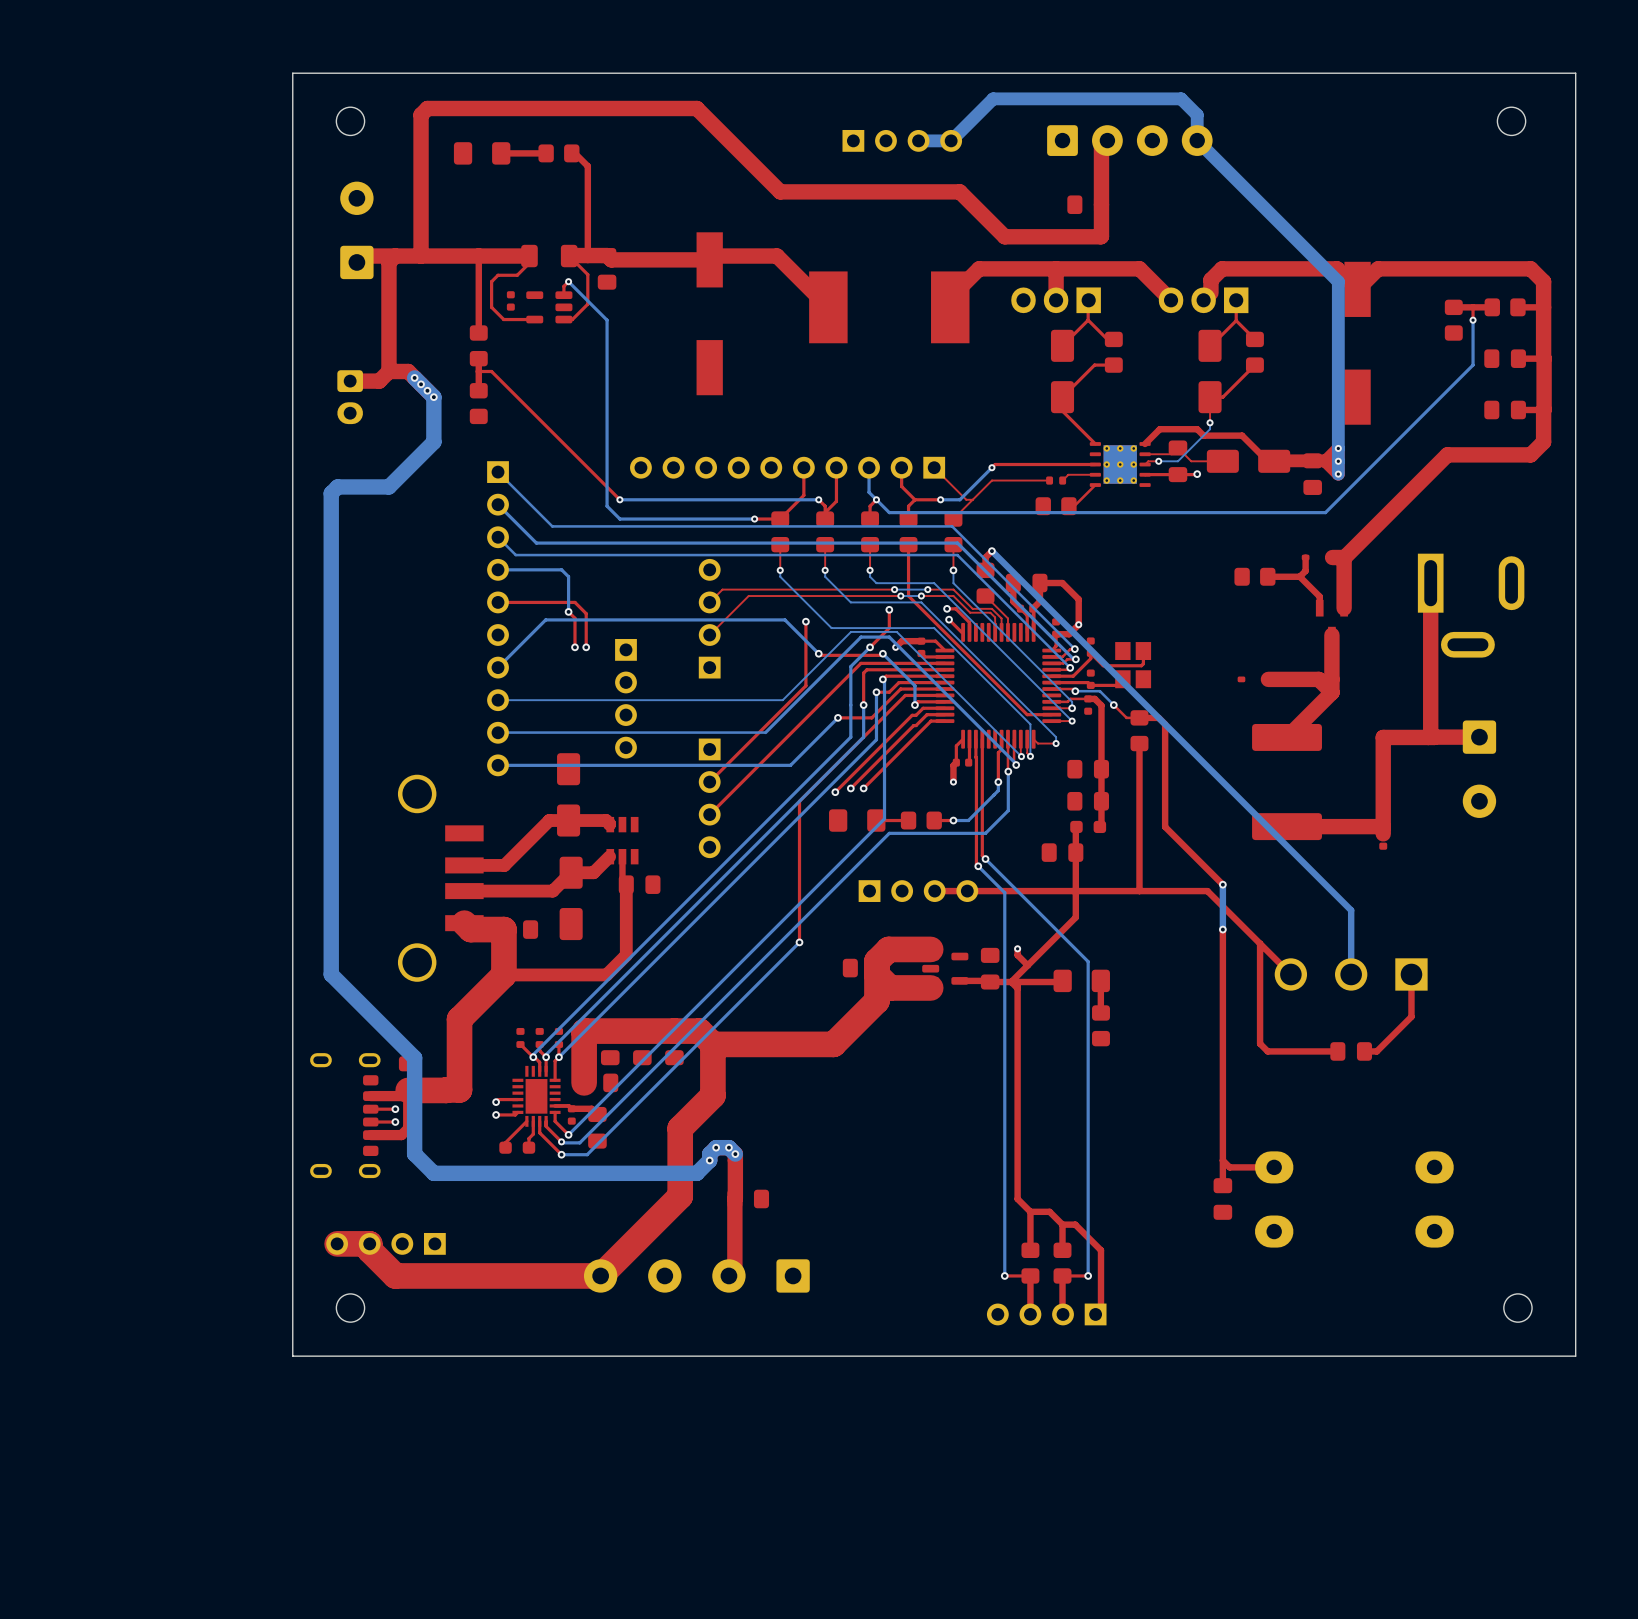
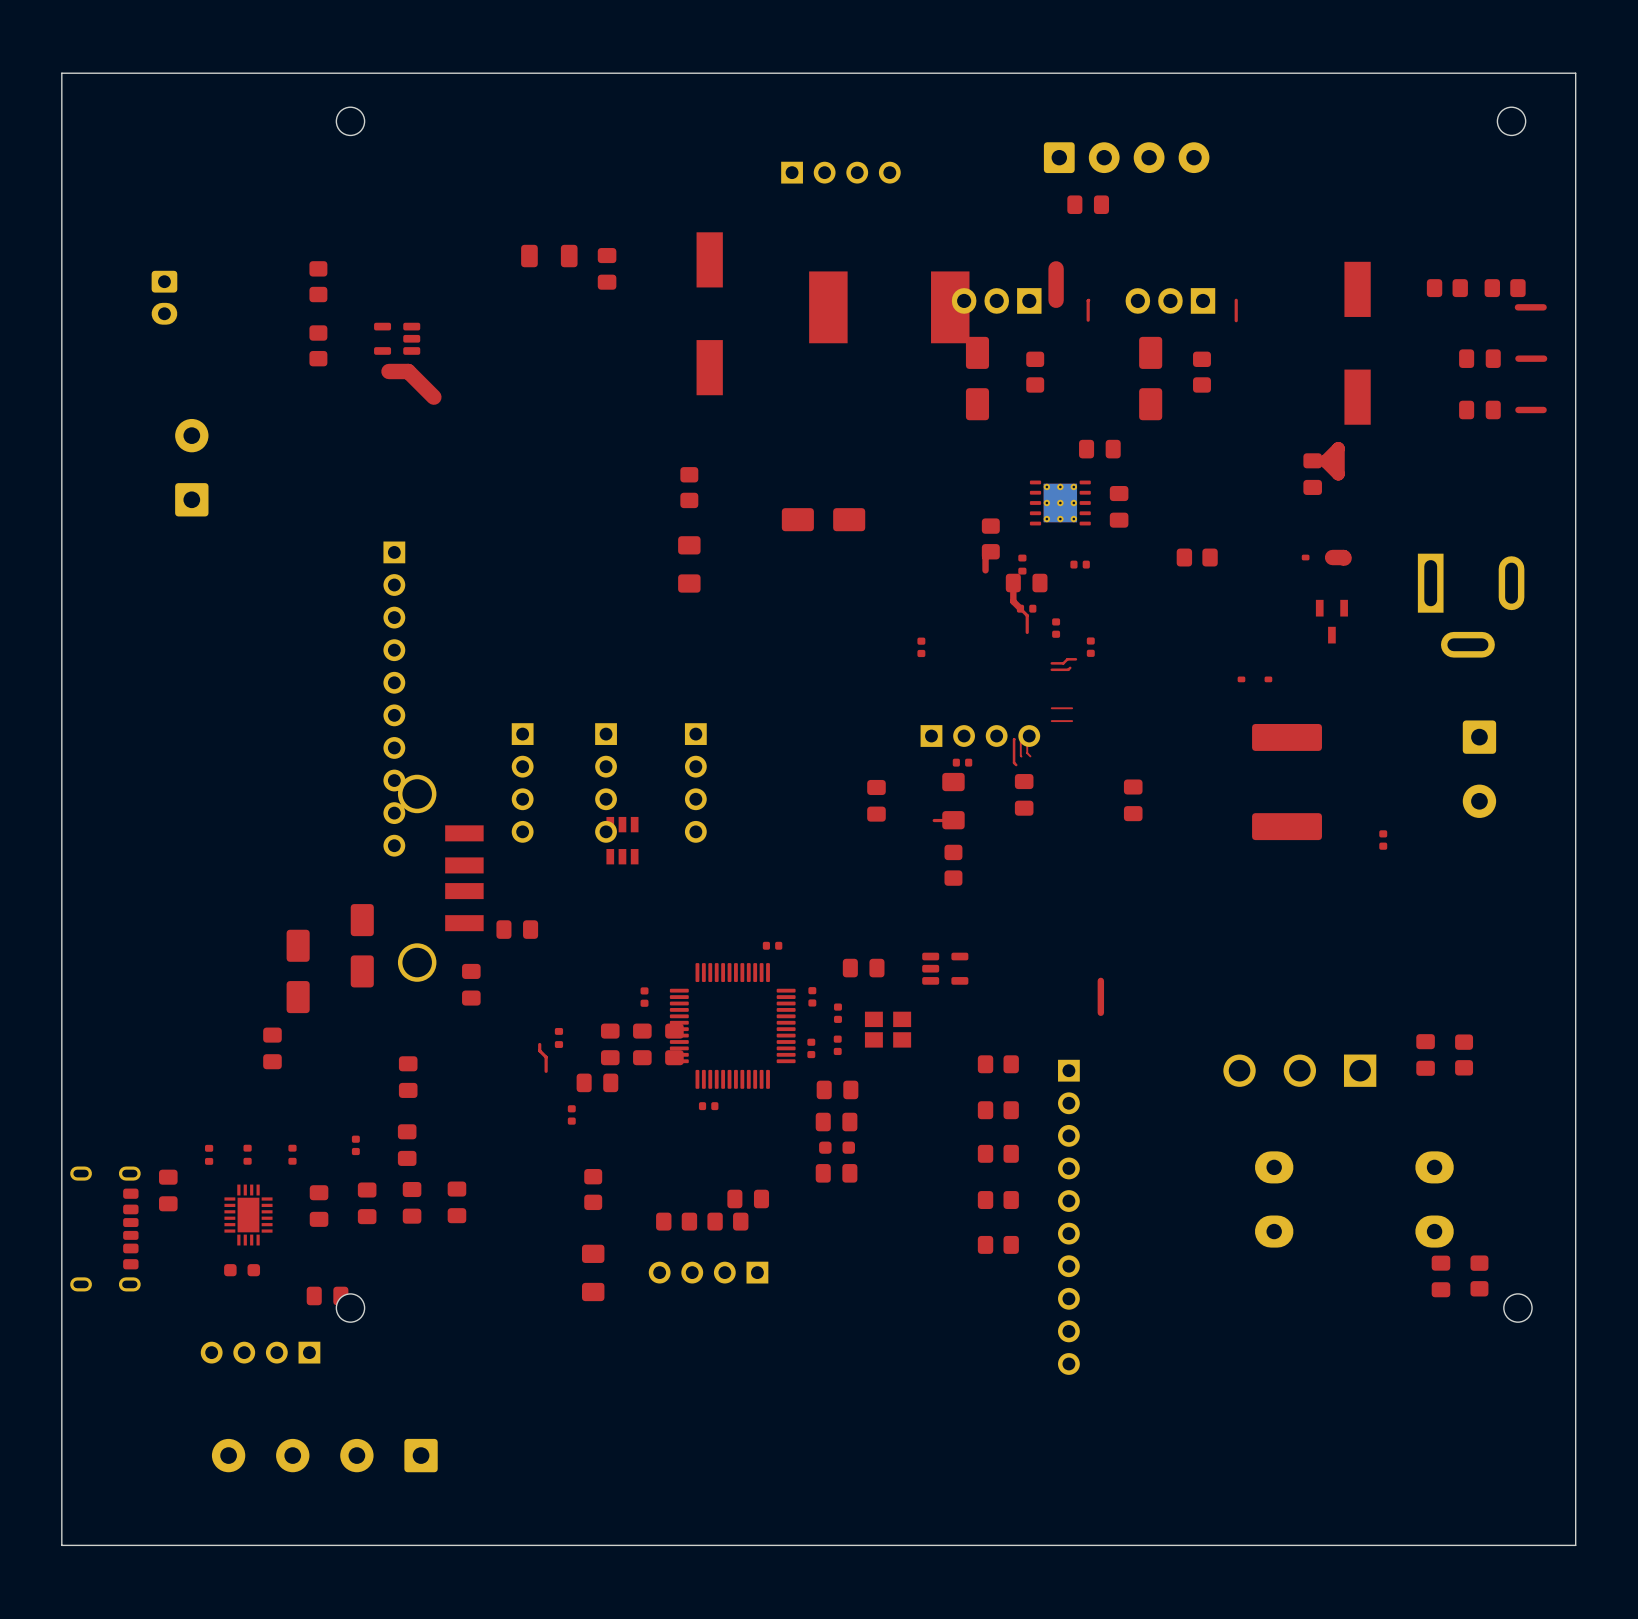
board edge: (292, 73) (292, 1356) (1575, 1356) -> (292, 73) (61, 73) (61, 1545) (1575, 1545) (1575, 1356)
part position: (902, 140) -> (840, 172)
bottom track: (918, 140) (951, 140) (993, 98) (1181, 98) (1197, 114) (1197, 140) (1338, 281) (1338, 474) -> none
top track: (1107, 140) (1101, 146) (1100, 236) (1004, 236) (959, 191) (780, 191) (696, 108) (427, 108) (421, 114) (421, 256) -> none
part position: (1129, 140) -> (1126, 157)
part: (482, 153) -> none
top track: (546, 153) (501, 153) -> none
part: (558, 153) -> none
top track: (571, 153) (574, 153) (587, 166) (587, 255) -> none
part position: (356, 230) -> (191, 467)
top track: (395, 256) (388, 262) (388, 371) (379, 381) (350, 381) -> none
top track: (478, 256) (478, 333) -> none
top track: (356, 262) (363, 256) (529, 256) (529, 263) (517, 275) (498, 275) (491, 281) (491, 307) (503, 319) (534, 319) -> none
part: none -> (318, 281)
top track: (568, 281) (563, 286) (563, 295) -> none
bottom track: (568, 281) (607, 320) (607, 506) (619, 519) (754, 519) -> none
via: (568, 281) -> none
part: none -> (1447, 288)
top track: (1210, 292) (1210, 279) (1222, 268) (1337, 268) (1357, 289) (1378, 268) (1530, 268) (1543, 281) (1543, 442) (1530, 454) (1447, 454) (1344, 558) (1344, 608) -> none
part: (510, 300) -> none
part: none -> (996, 300)
part: (1056, 300) -> none
top track: (1171, 300) (1139, 268) (979, 268) (950, 297) (950, 307) -> none
part position: (1203, 300) -> (1170, 300)
part position: (549, 307) -> (397, 338)
top track: (828, 307) (777, 256) (713, 256) (709, 259) (611, 259) (607, 255) (569, 255) (587, 274) (587, 304) (572, 319) (563, 319) -> none
top track: (1473, 307) (1473, 320) -> none
top track: (1492, 307) (1453, 307) -> none
part position: (1505, 307) -> (1505, 288)
part: (1453, 320) -> none
bottom track: (1473, 320) (1473, 365) (1325, 512) (889, 512) (869, 492) (869, 467) -> none
via: (1473, 320) -> none
part footprint: [1198, 329, 1222, 414] -> [1193, 351, 1211, 393]
top track: (1113, 339) (1107, 339) (1088, 320) (1062, 345) (1068, 345) -> none
top track: (1254, 339) (1236, 320) (1210, 345) -> none
part: none -> (318, 345)
part: (478, 345) -> none
part position: (1113, 352) -> (1035, 372)
part: (1254, 352) -> none
top track: (478, 358) (478, 390) -> none
part position: (1505, 358) -> (1479, 358)
top track: (1113, 365) (1094, 365) (1062, 397) (1062, 411) (1095, 443) -> none
top track: (1254, 365) (1222, 397) (1210, 397) (1210, 422) -> none
top track: (478, 371) (491, 371) (619, 499) -> none
part: (1062, 371) -> none
bottom track: (414, 377) (433, 397) (433, 442) (388, 486) (337, 486) (331, 493) (331, 974) (414, 1057) (414, 1154) (433, 1173) (696, 1173) (709, 1160) (709, 1154) (716, 1147) (728, 1147) (735, 1154) -> none
via: (414, 377) -> none
part: none -> (977, 378)
part: none -> (1150, 378)
via: (421, 384) -> none
via: (427, 390) -> none
part position: (350, 397) -> (164, 297)
via: (433, 397) -> none
part: (478, 403) -> none
part position: (1505, 409) -> (1479, 409)
bottom track: (1210, 422) (1210, 429) (1177, 461) (1158, 461) -> none
via: (1210, 422) -> none
top track: (1145, 443) (1159, 429) (1197, 429) (1203, 435) (1242, 435) (1267, 461) (1338, 461) -> none
via: (1338, 448) -> none
part: none -> (1099, 449)
top track: (1145, 454) (1171, 454) (1177, 447) (1191, 461) (1222, 461) -> none
top track: (1158, 461) (1148, 461) (1145, 464) -> none
via: (1158, 461) -> none
part: (1177, 461) -> none
part: (1248, 461) -> none
via: (1338, 461) -> none
top track: (1095, 464) (995, 464) (991, 467) -> none
part: (1120, 464) -> none
part: (787, 467) -> none
top track: (803, 467) (803, 495) (780, 519) (754, 519) -> none
top track: (836, 467) (836, 501) (825, 512) (825, 519) (825, 506) (818, 499) -> none
top track: (934, 467) (966, 499) (972, 499) -> none
bottom track: (991, 467) (959, 499) (940, 499) -> none
via: (991, 467) -> none
bottom track: (498, 472) (552, 526) (952, 526) (1074, 649) -> none
top track: (908, 474) (901, 467) (901, 486) (914, 499) -> none
top track: (1095, 474) (1068, 474) (1062, 480) -> none
top track: (1197, 474) (1145, 474) -> none
via: (1197, 474) -> none
via: (1338, 474) -> none
top track: (1049, 480) (991, 480) (953, 519) -> none
part rotation: 0° (1056, 480) -> 90° clockwise (1022, 564)
part position: (1056, 480) -> (1022, 564)
top track: (1095, 485) (1074, 506) (1068, 506) -> none
part: none -> (689, 487)
part footprint: [1035, 497, 1077, 516] -> [1029, 480, 1091, 526]
via: (619, 499) -> none
bottom track: (818, 499) (619, 499) -> none
via: (818, 499) -> none
top track: (876, 499) (870, 506) (870, 519) -> none
via: (876, 499) -> none
top track: (914, 499) (908, 506) (908, 519) -> none
top track: (940, 499) (914, 499) -> none
via: (940, 499) -> none
bottom track: (498, 504) (536, 543) (957, 543) (1073, 659) (1075, 659) -> none
part: none -> (1119, 506)
part footprint: [816, 511, 835, 553] -> [781, 508, 866, 532]
via: (754, 519) -> none
part: (780, 531) -> none
part: (870, 531) -> none
part: (908, 531) -> none
part: (953, 531) -> none
bottom track: (498, 537) (515, 555) (957, 555) (1070, 667) -> none
part: none -> (990, 538)
top track: (780, 544) (780, 570) -> none
top track: (825, 544) (825, 570) -> none
top track: (870, 544) (870, 570) -> none
top track: (908, 544) (908, 596) (1027, 714) (1051, 714) -> none
top track: (953, 544) (953, 570) -> none
bottom track: (991, 551) (1351, 910) (1351, 974) -> none
via: (991, 551) -> none
top track: (1305, 557) (1305, 570) (1299, 576) -> none
part: none -> (689, 564)
part: none -> (1080, 564)
bottom track: (498, 569) (561, 569) (568, 576) (568, 611) -> none
bottom track: (780, 570) (780, 576) (831, 628) (934, 628) (1030, 724) (1030, 756) -> none
via: (780, 570) -> none
bottom track: (825, 570) (825, 576) (850, 602) (921, 602) (1056, 737) (1056, 743) -> none
via: (825, 570) -> none
bottom track: (870, 570) (870, 576) (876, 583) (934, 583) (1072, 721) -> none
via: (870, 570) -> none
bottom track: (953, 570) (953, 583) (1072, 701) (1072, 708) -> none
via: (953, 570) -> none
part position: (1254, 576) -> (1197, 557)
top track: (1299, 576) (1267, 576) -> none
top track: (1299, 576) (1319, 596) (1319, 608) -> none
part: (985, 583) -> none
top track: (1430, 583) (1430, 734) (1428, 737) -> none
top track: (894, 589) (722, 589) (709, 602) -> none
via: (894, 589) -> none
top track: (927, 589) (953, 589) (972, 608) (991, 608) (1001, 618) (1001, 632) -> none
bottom track: (927, 589) (894, 589) -> none
via: (927, 589) -> none
top track: (900, 596) (748, 596) (709, 635) -> none
via: (900, 596) -> none
top track: (921, 596) (953, 596) (970, 612) (990, 612) (995, 617) (995, 632) -> none
bottom track: (921, 596) (900, 596) -> none
via: (921, 596) -> none
top track: (985, 596) (1007, 618) (1007, 632) -> none
top track: (498, 602) (574, 602) (586, 613) (586, 647) -> none
top track: (947, 608) (955, 608) (969, 622) (969, 632) -> none
via: (947, 608) -> none
top track: (889, 609) (889, 628) (870, 647) -> none
via: (889, 609) -> none
top track: (568, 611) (574, 618) (574, 647) -> none
via: (568, 611) -> none
part position: (498, 618) -> (394, 699)
part: (709, 618) -> none
top track: (949, 619) (963, 632) -> none
via: (949, 619) -> none
top track: (805, 621) (805, 685) (709, 782) -> none
via: (805, 621) -> none
via: (1078, 624) -> none
top track: (1033, 632) (1032, 608) (1039, 601) (1039, 583) (1062, 583) (1078, 599) (1078, 624) (1069, 634) (1056, 634) (1056, 646) (1051, 650) -> none
top track: (1331, 635) (1331, 692) -> none
via: (574, 647) -> none
via: (586, 647) -> none
bottom track: (870, 647) (850, 666) (850, 737) (533, 1054) (533, 1057) -> none
via: (870, 647) -> none
top track: (895, 647) (901, 641) (935, 641) (944, 650) -> none
via: (895, 647) -> none
top track: (1074, 649) (1070, 649) (1062, 656) (1051, 656) -> none
via: (1074, 649) -> none
top track: (1143, 651) (1143, 663) (1141, 665) (1103, 665) (1090, 653) (1090, 658) (1073, 676) (1051, 676) -> none
bottom track: (818, 653) (784, 619) (545, 619) (498, 667) -> none
via: (818, 653) -> none
top track: (882, 653) (881, 655) (820, 655) (818, 653) -> none
bottom track: (882, 653) (914, 685) (914, 705) -> none
via: (882, 653) -> none
top track: (921, 653) (924, 656) (944, 656) -> none
via: (1075, 659) -> none
top track: (944, 663) (860, 663) (709, 814) -> none
part: (1133, 665) -> none
via: (1070, 667) -> none
top track: (944, 669) (866, 669) (863, 672) (863, 705) -> none
top track: (944, 676) (886, 676) (882, 679) -> none
bottom track: (882, 679) (884, 681) (884, 818) (568, 1134) -> none
via: (882, 679) -> none
part: (1090, 679) -> none
top track: (1122, 679) (1116, 685) (1090, 685) (1088, 682) (1051, 682) -> none
top track: (1268, 679) (1318, 679) (1331, 692) -> none
top track: (944, 682) (898, 682) (889, 692) (876, 692) -> none
part: (998, 685) -> none
top track: (944, 689) (900, 689) (871, 717) (837, 717) -> none
top track: (1051, 689) (1073, 689) (1075, 691) -> none
bottom track: (1075, 691) (1099, 691) (1113, 705) -> none
via: (1075, 691) -> none
bottom track: (876, 692) (876, 739) (558, 1057) -> none
via: (876, 692) -> none
top track: (1331, 692) (1287, 737) -> none
top track: (944, 695) (905, 695) (799, 801) (799, 942) -> none
part: (625, 698) -> none
top track: (1088, 698) (1094, 698) (1101, 705) (1101, 825) (1099, 826) -> none
top track: (1088, 698) (1051, 701) -> none
bottom track: (498, 700) (782, 700) (851, 631) (896, 631) (1021, 756) -> none
top track: (944, 701) (918, 701) (914, 705) -> none
bottom track: (863, 705) (863, 737) (546, 1054) (546, 1057) -> none
via: (863, 705) -> none
via: (914, 705) -> none
part: (1088, 705) -> none
top track: (1113, 705) (1126, 717) (1158, 717) (1165, 724) (1165, 826) (1222, 884) -> none
via: (1113, 705) -> none
top track: (944, 708) (923, 708) (916, 715) (912, 715) (835, 792) -> none
via: (1072, 708) -> none
top track: (944, 714) (926, 714) (850, 788) -> none
bottom track: (837, 717) (790, 765) (498, 765) -> none
via: (837, 717) -> none
top track: (944, 721) (931, 721) (863, 788) -> none
via: (1072, 721) -> none
part: (1139, 730) -> none
bottom track: (498, 732) (765, 732) (861, 637) (889, 637) (1016, 765) -> none
part: none -> (980, 736)
top track: (1479, 737) (1383, 737) (1383, 833) -> none
top track: (963, 739) (956, 745) (953, 782) -> none
top track: (969, 739) (968, 762) -> none
top track: (975, 739) (976, 864) (978, 866) -> none
top track: (982, 739) (982, 855) (985, 859) -> none
top track: (1001, 739) (1001, 749) (998, 752) (998, 782) -> none
top track: (1007, 739) (1008, 771) -> none
top track: (1033, 739) (1037, 743) (1056, 743) -> none
via: (1056, 743) -> none
top track: (1139, 743) (1139, 891) -> none
via: (1021, 756) -> none
via: (1030, 756) -> none
via: (1016, 765) -> none
part: (1088, 769) -> none
bottom track: (1008, 771) (1008, 810) (985, 833) (889, 833) (579, 1142) (561, 1141) -> none
via: (1008, 771) -> none
part: none -> (522, 782)
part: none -> (606, 782)
via: (953, 782) -> none
bottom track: (998, 782) (998, 790) (968, 820) (953, 820) -> none
via: (998, 782) -> none
via: (850, 788) -> none
via: (863, 788) -> none
via: (835, 792) -> none
part: (568, 794) -> none
part: none -> (1024, 794)
part position: (709, 798) -> (695, 782)
part: none -> (876, 800)
part: none -> (1133, 800)
part: (1088, 801) -> none
part rotation: 0° (857, 820) -> 90° clockwise (953, 801)
part position: (857, 820) -> (953, 801)
top track: (908, 820) (876, 820) -> none
part rotation: 0° (921, 820) -> 90° clockwise (953, 865)
part position: (921, 820) -> (953, 865)
via: (953, 820) -> none
top track: (609, 824) (606, 820) (549, 820) (504, 865) (464, 865) -> none
top track: (1076, 826) (1075, 917) (1011, 982) (1017, 988) -> none
part: (1088, 826) -> none
top track: (1287, 826) (1383, 826) -> none
part: (1062, 852) -> none
top track: (609, 856) (593, 872) (571, 872) (552, 891) (464, 891) -> none
top track: (622, 856) (622, 880) (626, 884) (626, 955) (606, 974) (503, 974) -> none
bottom track: (985, 859) (1088, 961) (1088, 1275) -> none
via: (985, 859) -> none
bottom track: (978, 866) (1004, 892) (1004, 1275) -> none
via: (978, 866) -> none
part: (639, 884) -> none
bottom track: (1222, 884) (1222, 929) -> none
via: (1222, 884) -> none
part: (918, 891) -> none
top track: (934, 891) (1207, 891) (1290, 974) -> none
part: (571, 898) -> none
top track: (464, 923) (470, 929) (503, 929) (503, 974) -> none
top track: (1222, 929) (1222, 1185) -> none
via: (1222, 929) -> none
bottom track: (799, 942) (587, 1154) (561, 1154) -> none
via: (799, 942) -> none
top track: (1260, 943) (1260, 1043) (1267, 1051) (1337, 1051) -> none
part: none -> (362, 945)
part: none -> (772, 945)
top track: (1017, 948) (1017, 955) (1027, 965) -> none
via: (1017, 948) -> none
top track: (930, 949) (888, 949) (876, 961) (876, 1000) (833, 1044) (712, 1044) -> none
part: (990, 968) -> none
part: none -> (298, 971)
top track: (503, 974) (459, 1019) (459, 1089) (408, 1090) -> none
top track: (876, 974) (889, 987) (930, 987) -> none
part position: (1351, 974) -> (1299, 1070)
top track: (1411, 974) (1411, 1016) (1376, 1051) (1364, 1051) -> none
top track: (1062, 980) (959, 980) -> none
part: (1081, 980) -> none
top track: (1017, 982) (1017, 1198) (1030, 1211) -> none
part: none -> (471, 984)
part: none -> (812, 996)
part: none -> (644, 997)
part: none -> (837, 1013)
part: none -> (732, 1025)
part: (1100, 1025) -> none
part: none -> (888, 1029)
part: (520, 1037) -> none
part: (539, 1037) -> none
top track: (520, 1044) (539, 1062) (539, 1071) -> none
top track: (558, 1044) (558, 1057) (555, 1061) (555, 1080) -> none
top track: (712, 1044) (712, 1095) (680, 1128) (680, 1196) (600, 1275) (395, 1275) (369, 1250) (369, 1243) (337, 1243) -> none
top track: (712, 1044) (699, 1031) (585, 1031) (584, 1082) -> none
part: none -> (837, 1045)
part: none -> (272, 1048)
part: none -> (811, 1048)
part rotation: 0° (1351, 1051) -> 90° clockwise (1425, 1054)
part position: (1351, 1051) -> (1425, 1054)
part: none -> (1464, 1054)
via: (533, 1057) -> none
via: (546, 1057) -> none
via: (558, 1057) -> none
part: none -> (998, 1064)
part: none -> (837, 1089)
top track: (408, 1090) (402, 1096) (370, 1096) -> none
top track: (408, 1090) (408, 1128) (401, 1135) (370, 1135) -> none
part position: (536, 1096) -> (248, 1215)
top track: (517, 1099) (498, 1099) (496, 1102) -> none
via: (496, 1102) -> none
top track: (555, 1105) (568, 1105) (571, 1108) (591, 1108) (597, 1114) -> none
part: none -> (708, 1106)
top track: (395, 1109) (370, 1109) -> none
via: (395, 1109) -> none
part: none -> (998, 1110)
top track: (517, 1112) (515, 1114) (496, 1114) -> none
top track: (555, 1112) (555, 1121) (568, 1134) -> none
via: (496, 1114) -> none
part position: (345, 1115) -> (105, 1228)
top track: (526, 1121) (505, 1142) (505, 1147) -> none
top track: (533, 1121) (533, 1134) (528, 1138) (528, 1147) -> none
top track: (539, 1121) (539, 1132) (561, 1154) -> none
top track: (546, 1121) (546, 1126) (561, 1141) -> none
top track: (395, 1122) (370, 1122) -> none
via: (395, 1122) -> none
part: none -> (836, 1122)
part: (597, 1127) -> none
via: (568, 1134) -> none
via: (561, 1141) -> none
part: none -> (355, 1145)
part: none -> (407, 1145)
part: (517, 1147) -> none
via: (716, 1147) -> none
via: (728, 1147) -> none
part: none -> (837, 1147)
part: none -> (998, 1153)
part: none -> (209, 1154)
part: none -> (247, 1154)
part: none -> (292, 1154)
via: (561, 1154) -> none
via: (735, 1154) -> none
top track: (709, 1160) (709, 1154) (716, 1147) (728, 1147) (735, 1154) (734, 1270) (728, 1275) -> none
via: (709, 1160) -> none
top track: (1222, 1160) (1229, 1167) (1274, 1167) -> none
part: none -> (836, 1173)
part: none -> (593, 1189)
part: none -> (168, 1190)
part: (1222, 1198) -> none
part: none -> (998, 1200)
part: none -> (412, 1202)
part: none -> (456, 1202)
part: none -> (367, 1203)
part: none -> (319, 1206)
top track: (1030, 1211) (1049, 1211) (1062, 1224) -> none
top track: (1030, 1211) (1030, 1250) -> none
part: none -> (1068, 1217)
part: none -> (676, 1221)
part: none -> (727, 1221)
top track: (1062, 1224) (1062, 1250) -> none
top track: (1062, 1224) (1075, 1224) (1100, 1250) (1100, 1309) (1095, 1314) -> none
part position: (386, 1243) -> (260, 1352)
part: none -> (998, 1244)
part footprint: [583, 1259, 810, 1293] -> [648, 1261, 769, 1284]
part: (1030, 1263) -> none
part: (1062, 1263) -> none
part: none -> (242, 1270)
part: none -> (593, 1272)
top track: (1004, 1275) (1030, 1275) (1030, 1314) -> none
via: (1004, 1275) -> none
top track: (1088, 1275) (1062, 1275) (1063, 1314) -> none
via: (1088, 1275) -> none
part: none -> (1479, 1275)
part: none -> (1440, 1276)
part: none -> (327, 1295)
part: (1046, 1314) -> none
part: none -> (324, 1455)

